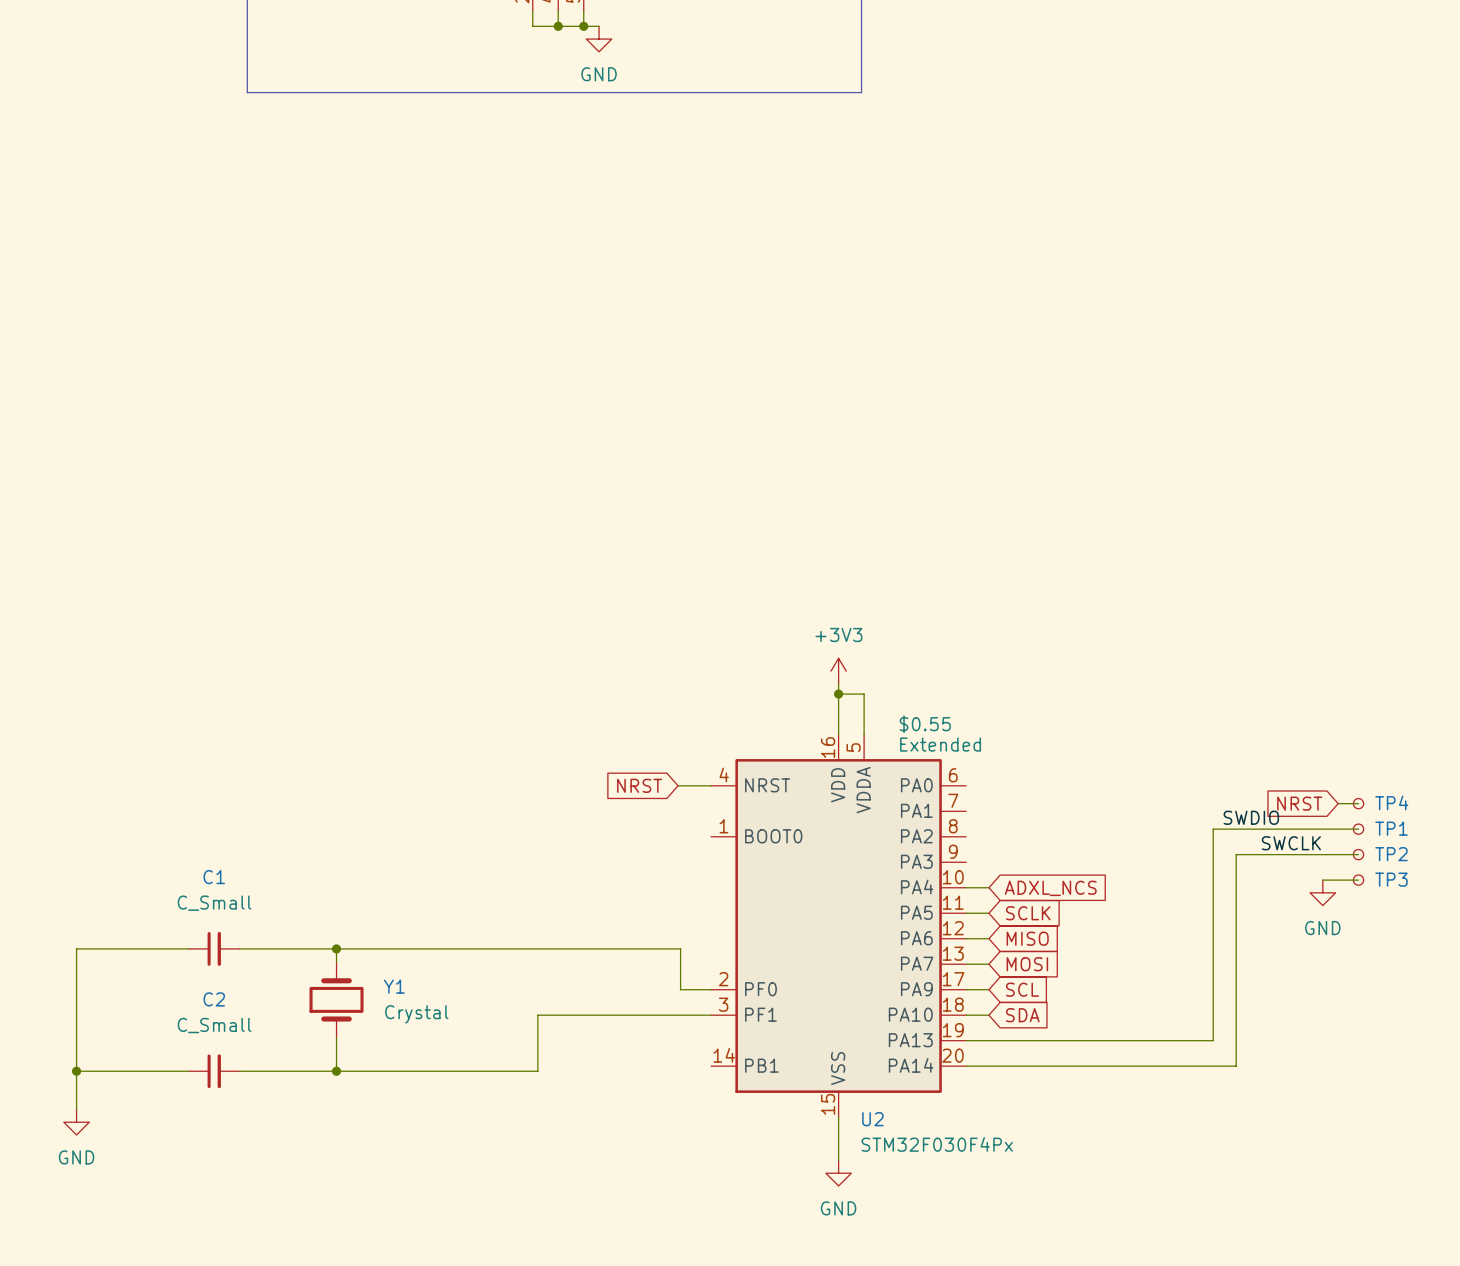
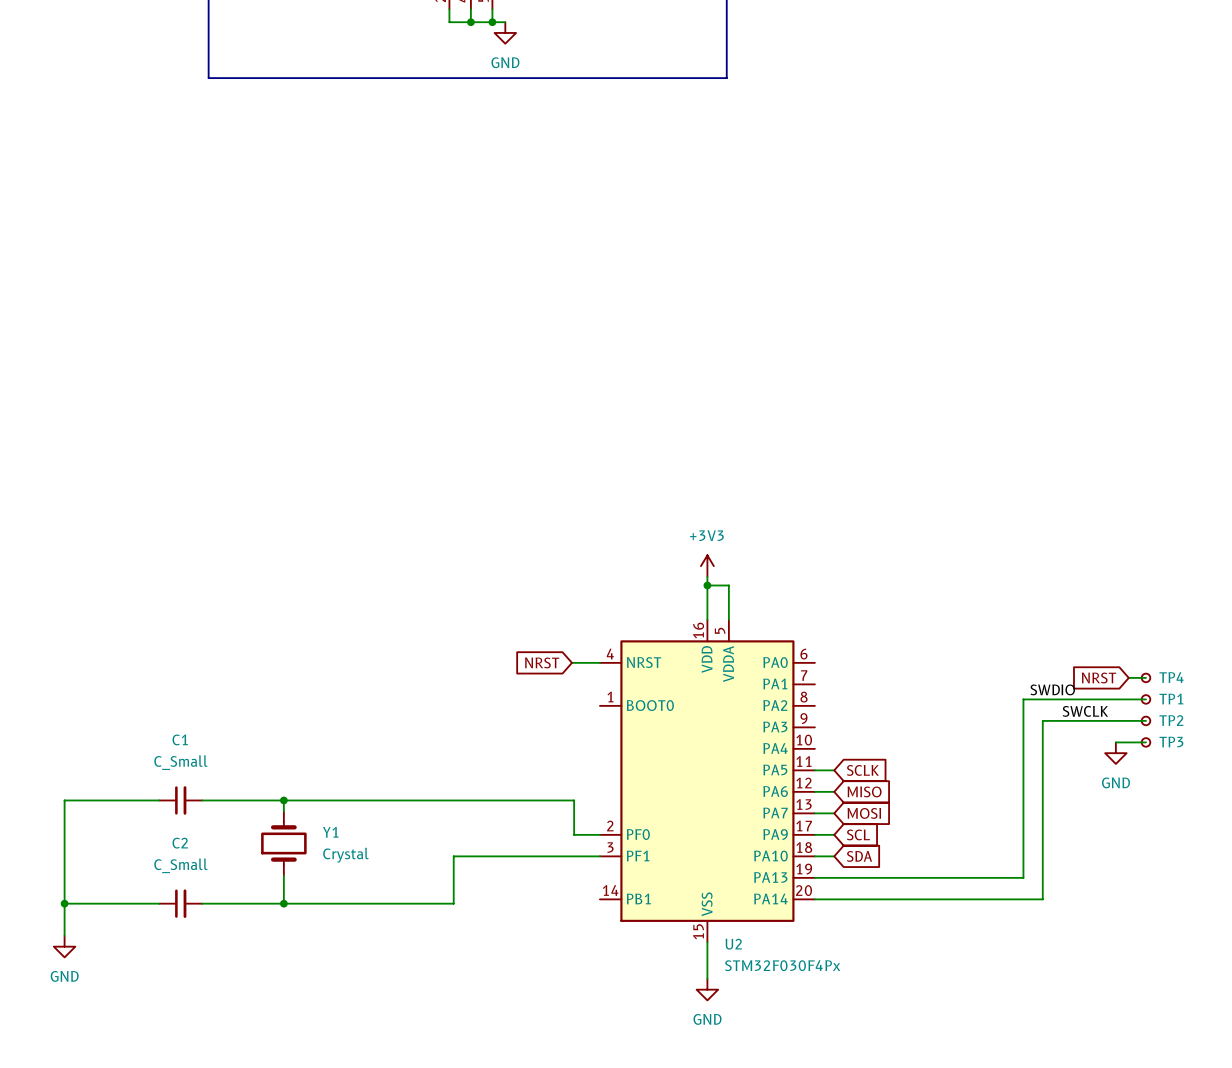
U2 text: $0.55 (925, 724) -> none
U2 text: Extended (940, 744) -> none
wire: (966, 887) (988, 887) -> none
global label: ADXL_NCS (1050, 888) -> none

